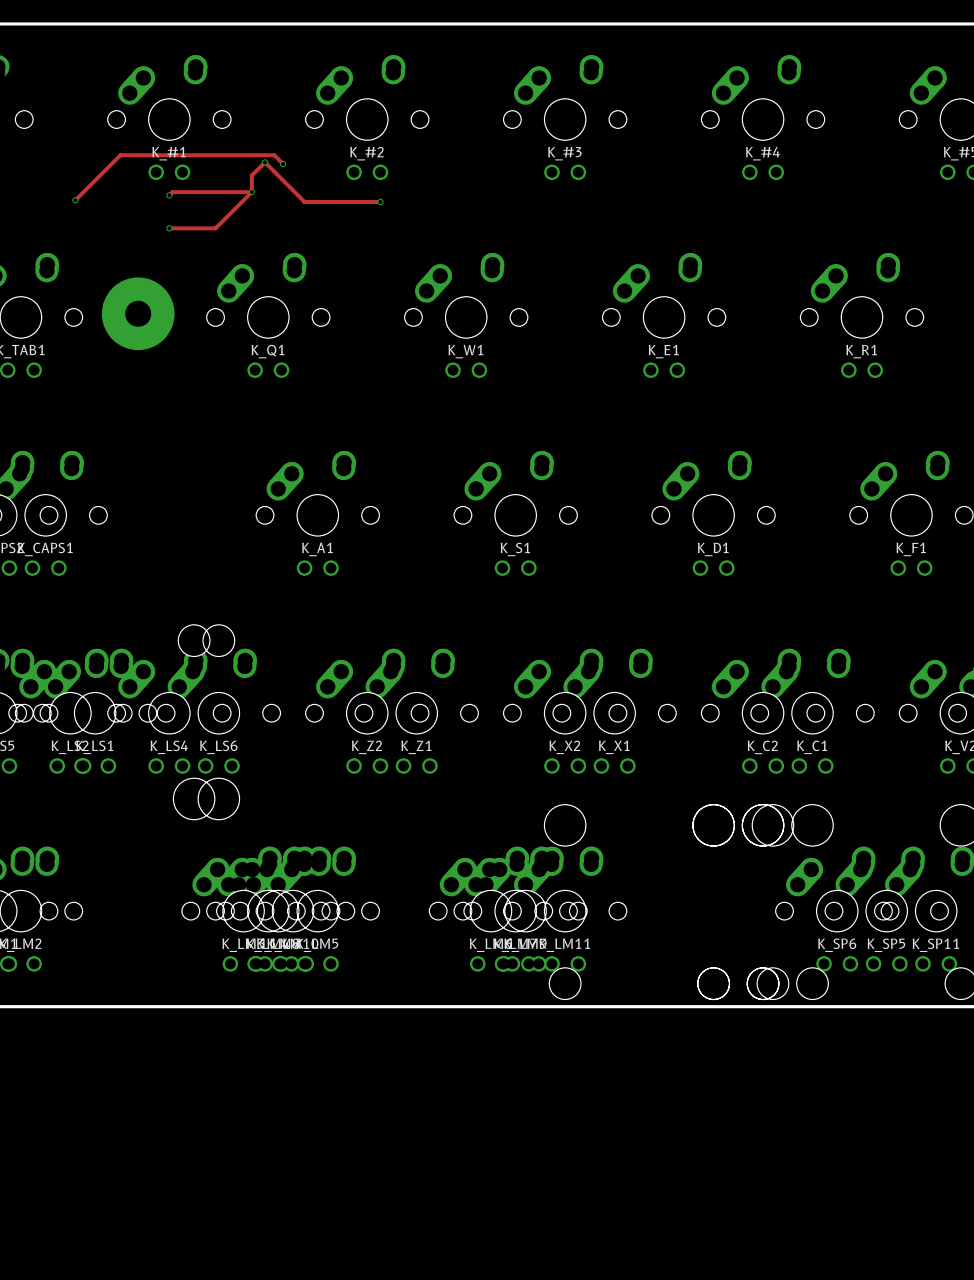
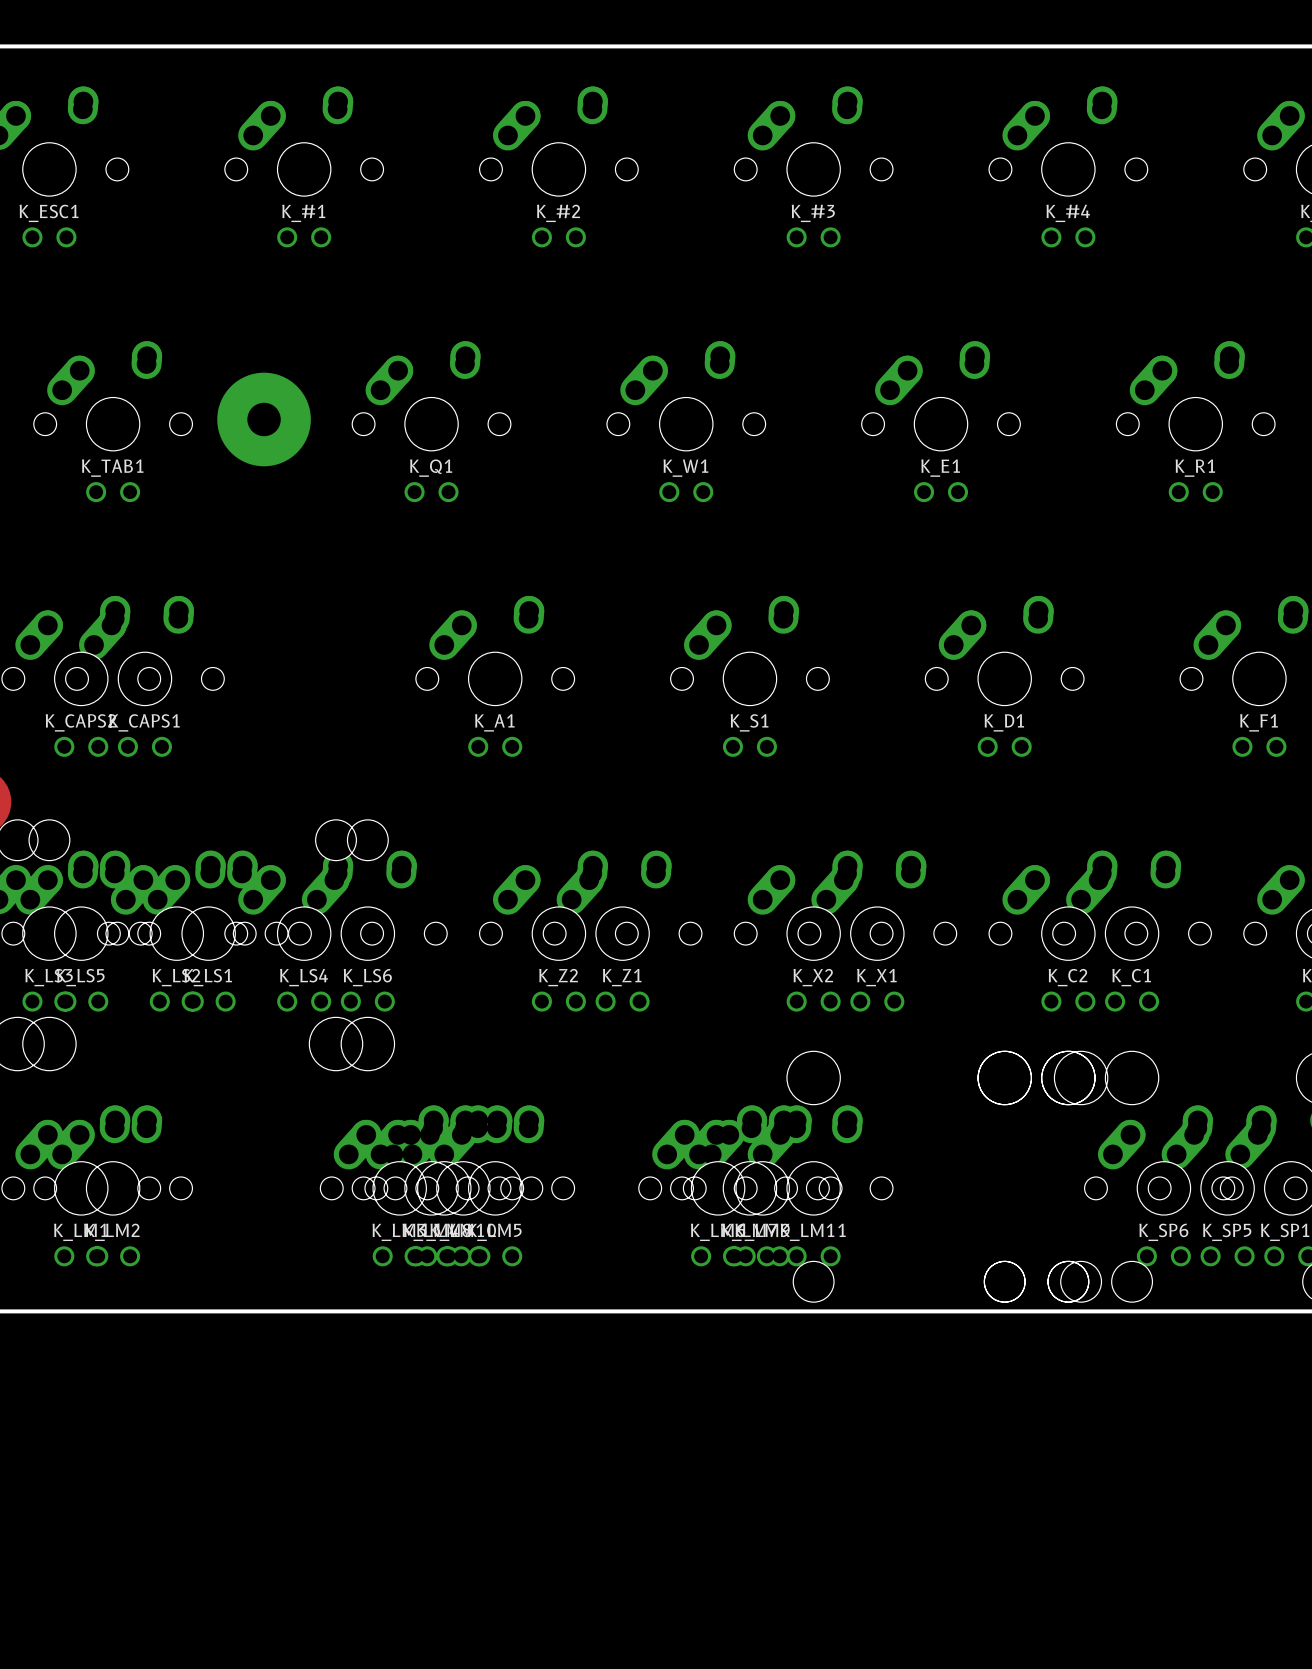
via: (265, 162) -> none
track: (283, 164) (274, 155) (120, 155) (75, 200) -> none
via: (283, 164) -> none
track: (251, 192) (251, 175) (265, 162) (304, 201) (380, 201) -> none
track: (251, 192) (215, 228) (169, 228) -> none
track: (251, 192) (172, 192) (169, 195) -> none
via: (251, 192) -> none
via: (169, 195) -> none
via: (75, 200) -> none
via: (380, 201) -> none
via: (169, 228) -> none

